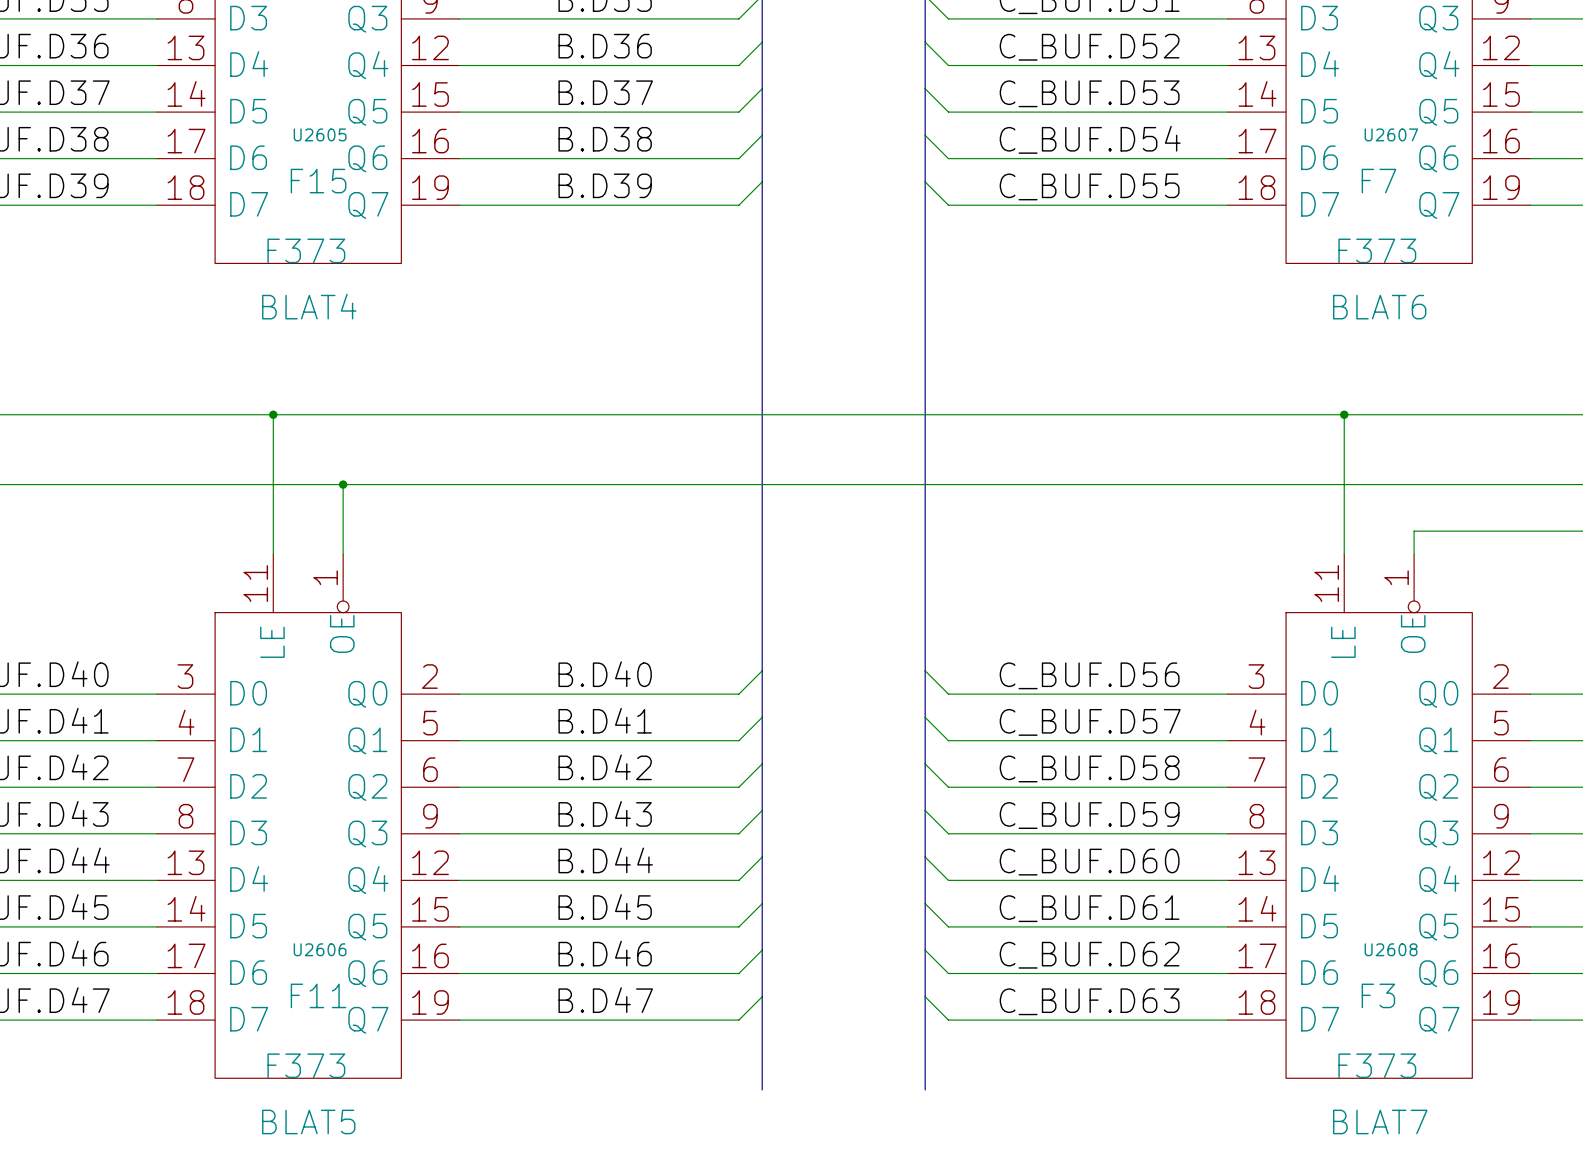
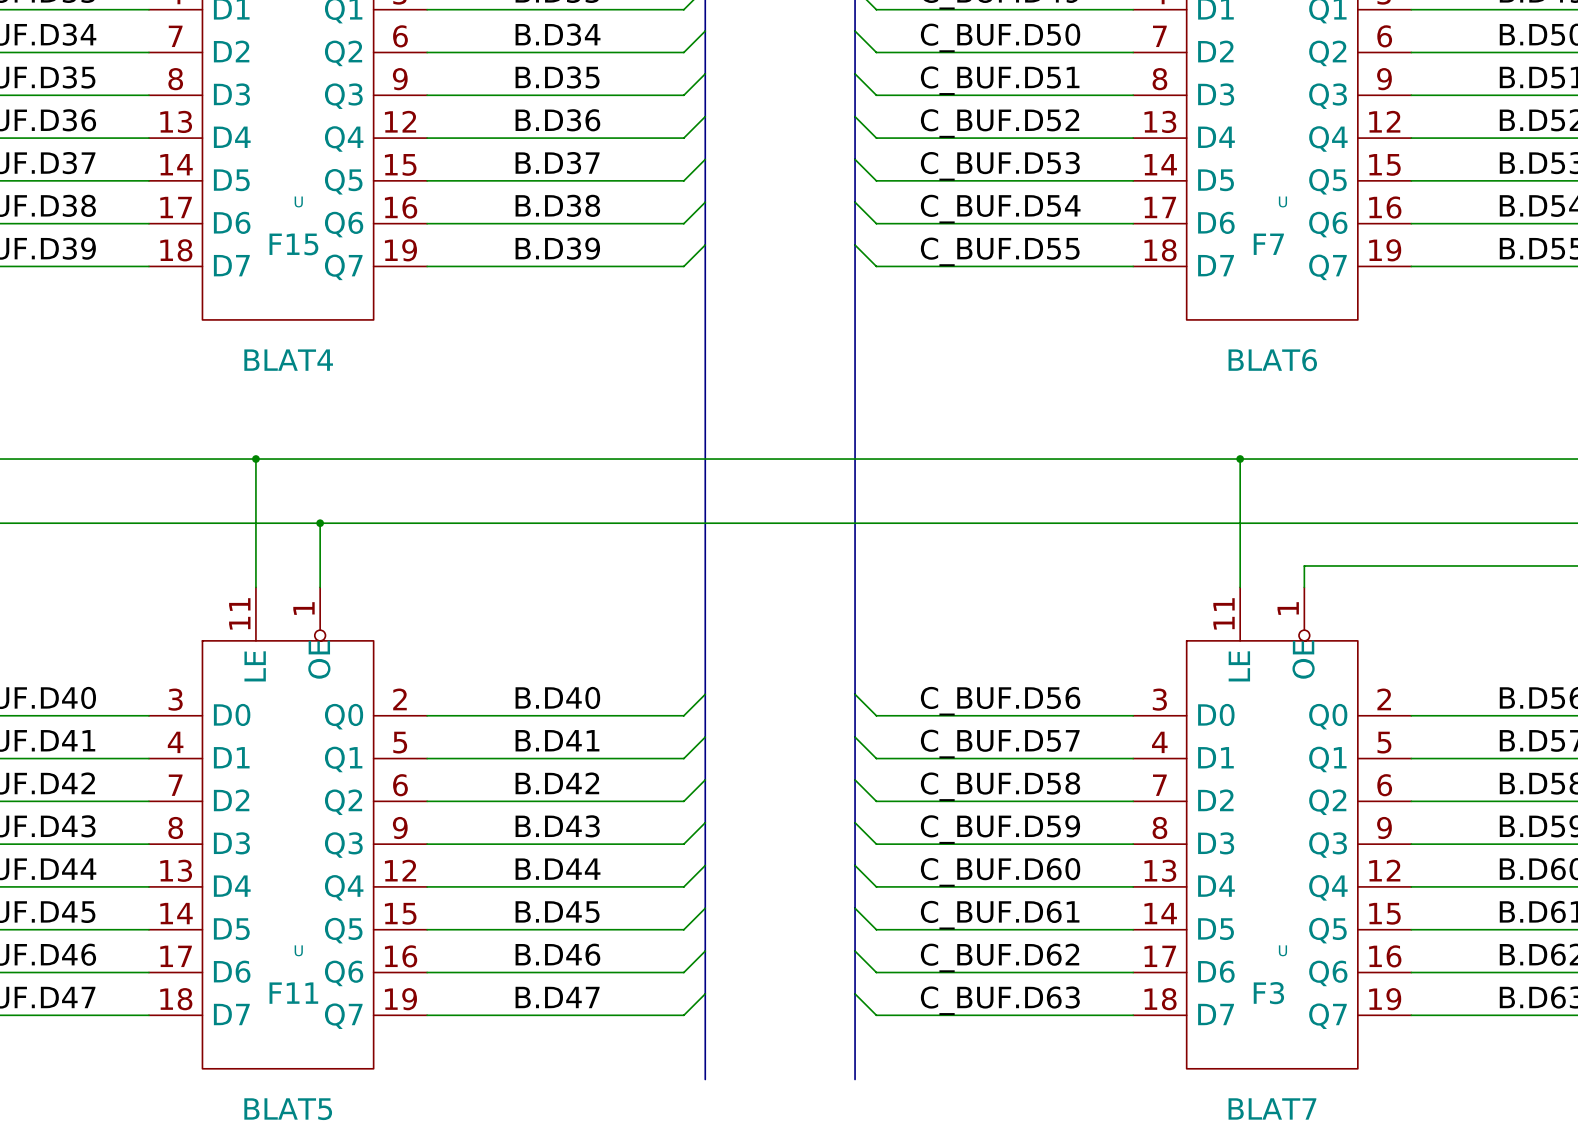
U2605 name: U2605 (320, 134) -> U (298, 201)
U2607 name: U2607 (1391, 134) -> U (1282, 201)
U2605 value: F373 (306, 250) -> none
U2607 value: F373 (1377, 250) -> none
U2606 name: U2606 (320, 949) -> U (298, 950)
U2608 name: U2608 (1391, 949) -> U (1282, 950)
U2606 value: F373 (306, 1065) -> none
U2608 value: F373 (1377, 1065) -> none

